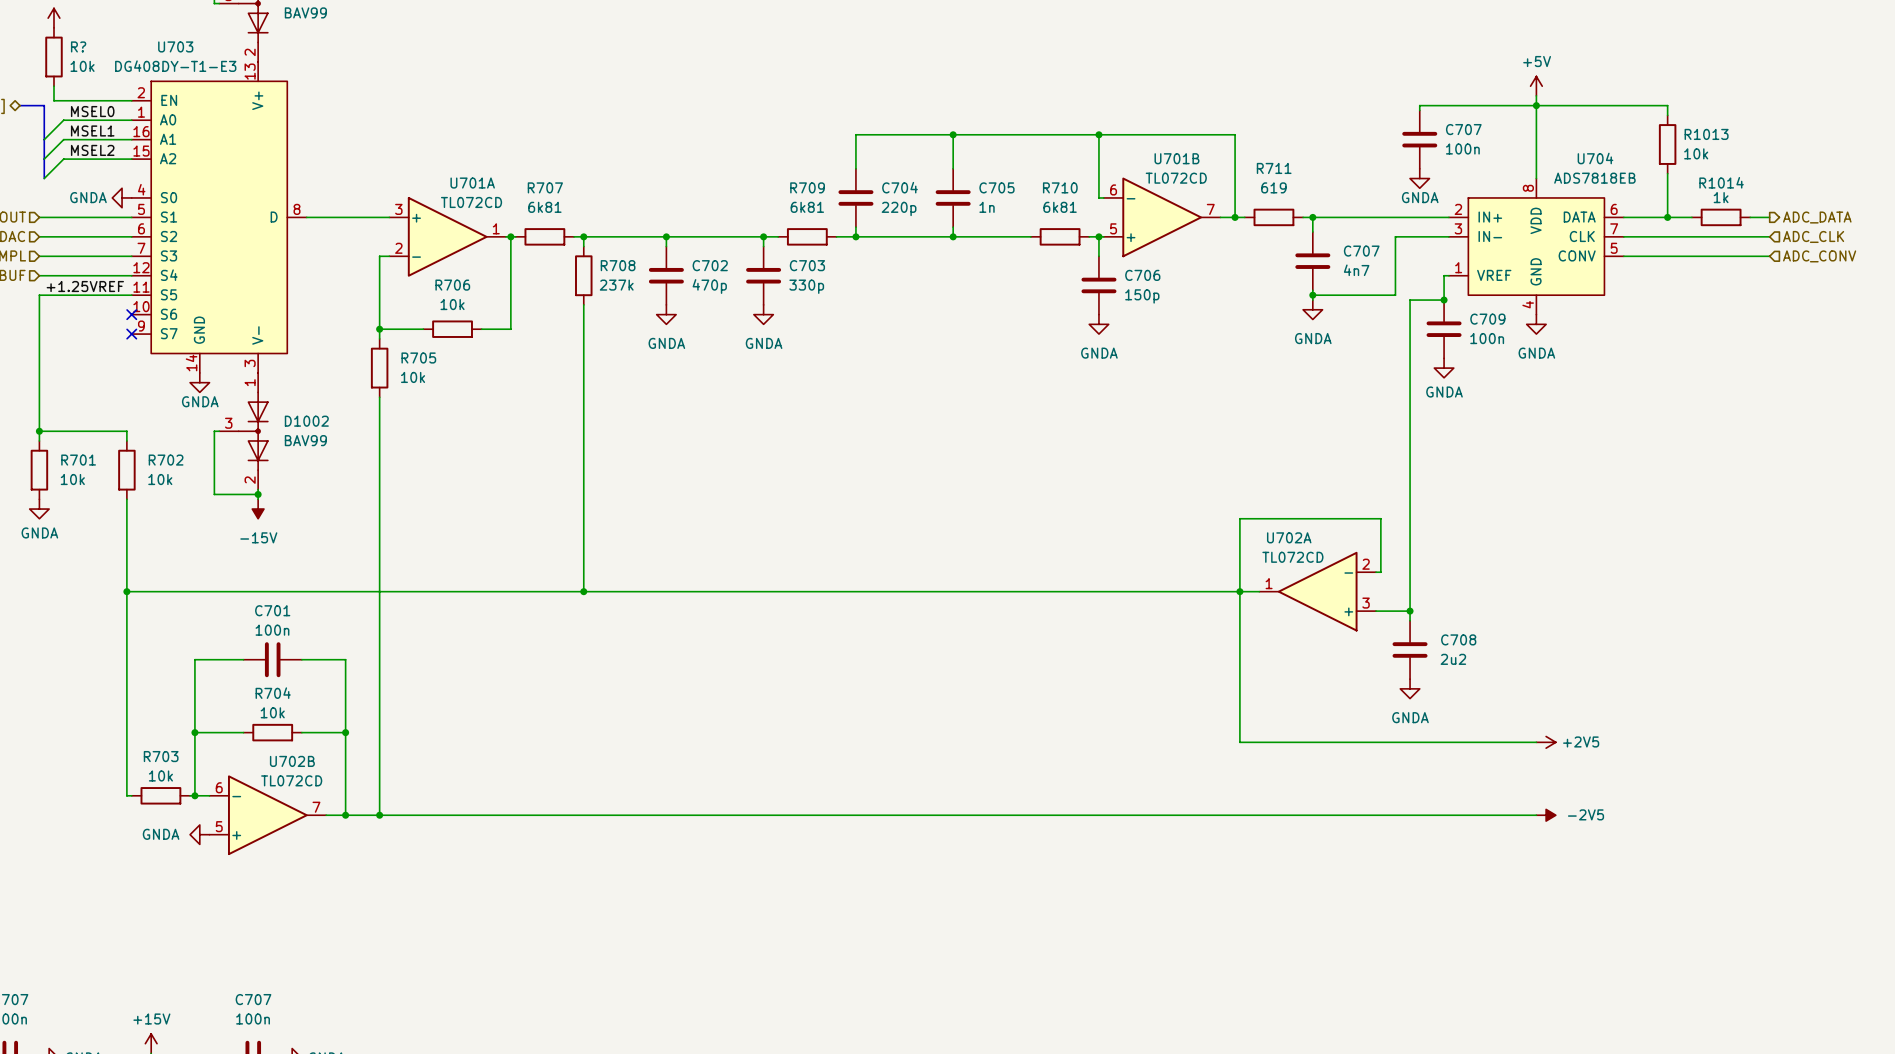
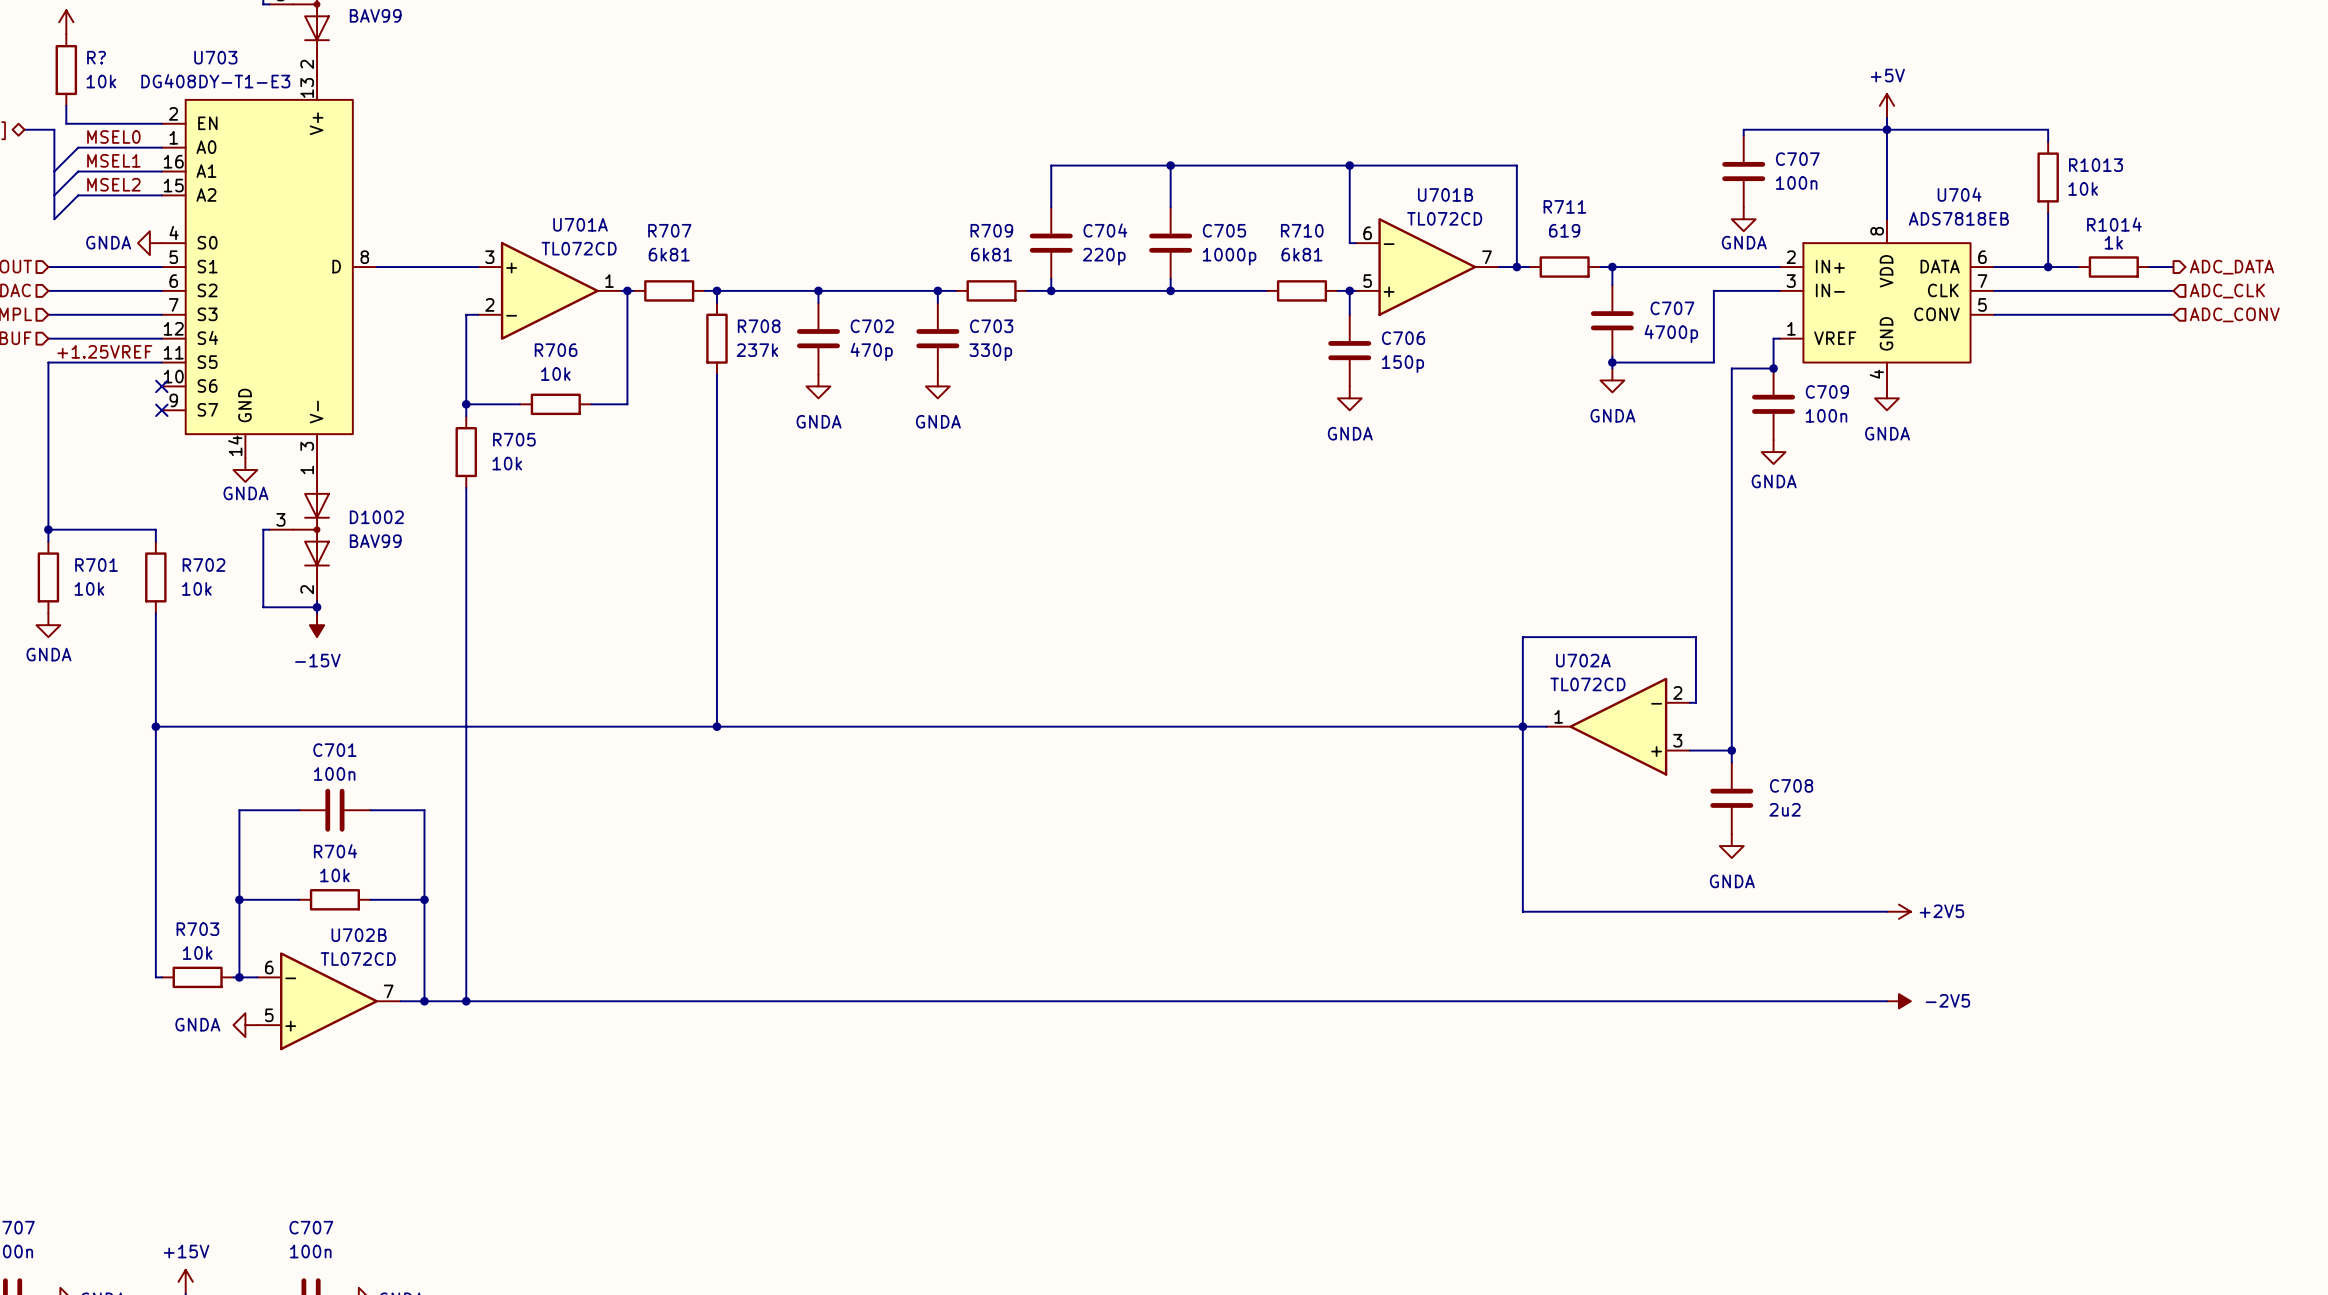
C705 value: 1n (987, 207) -> 1000p (1229, 256)
C707 value: 4n7 (1356, 270) -> 4700p (1671, 333)

